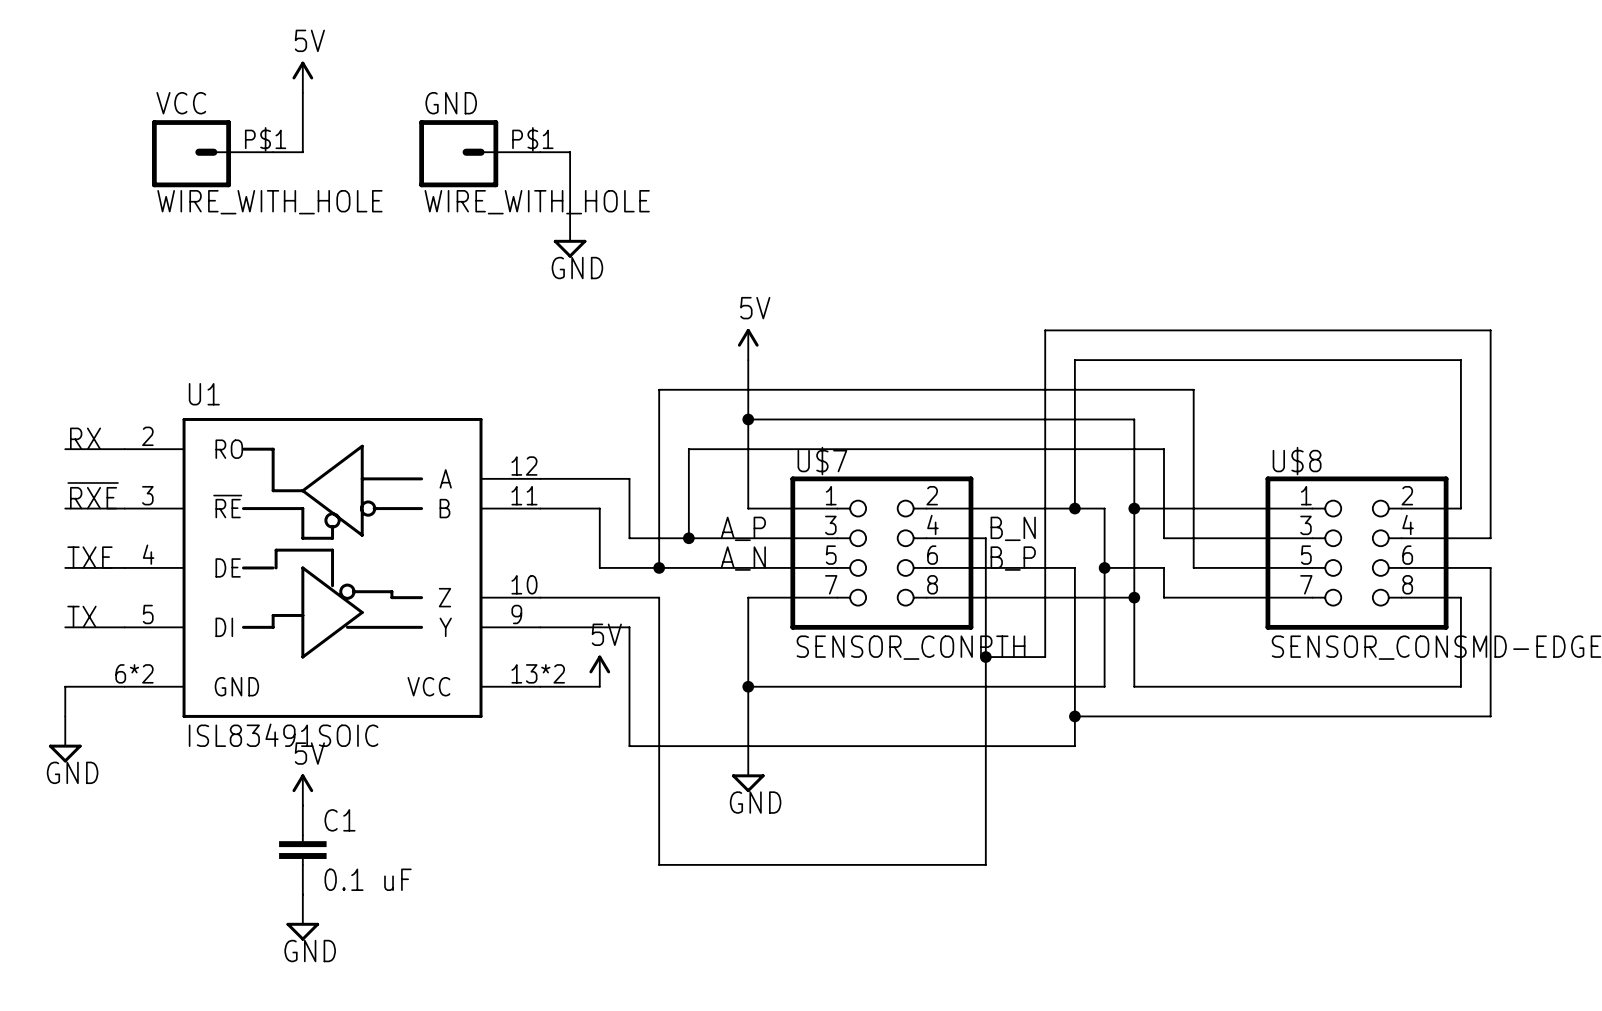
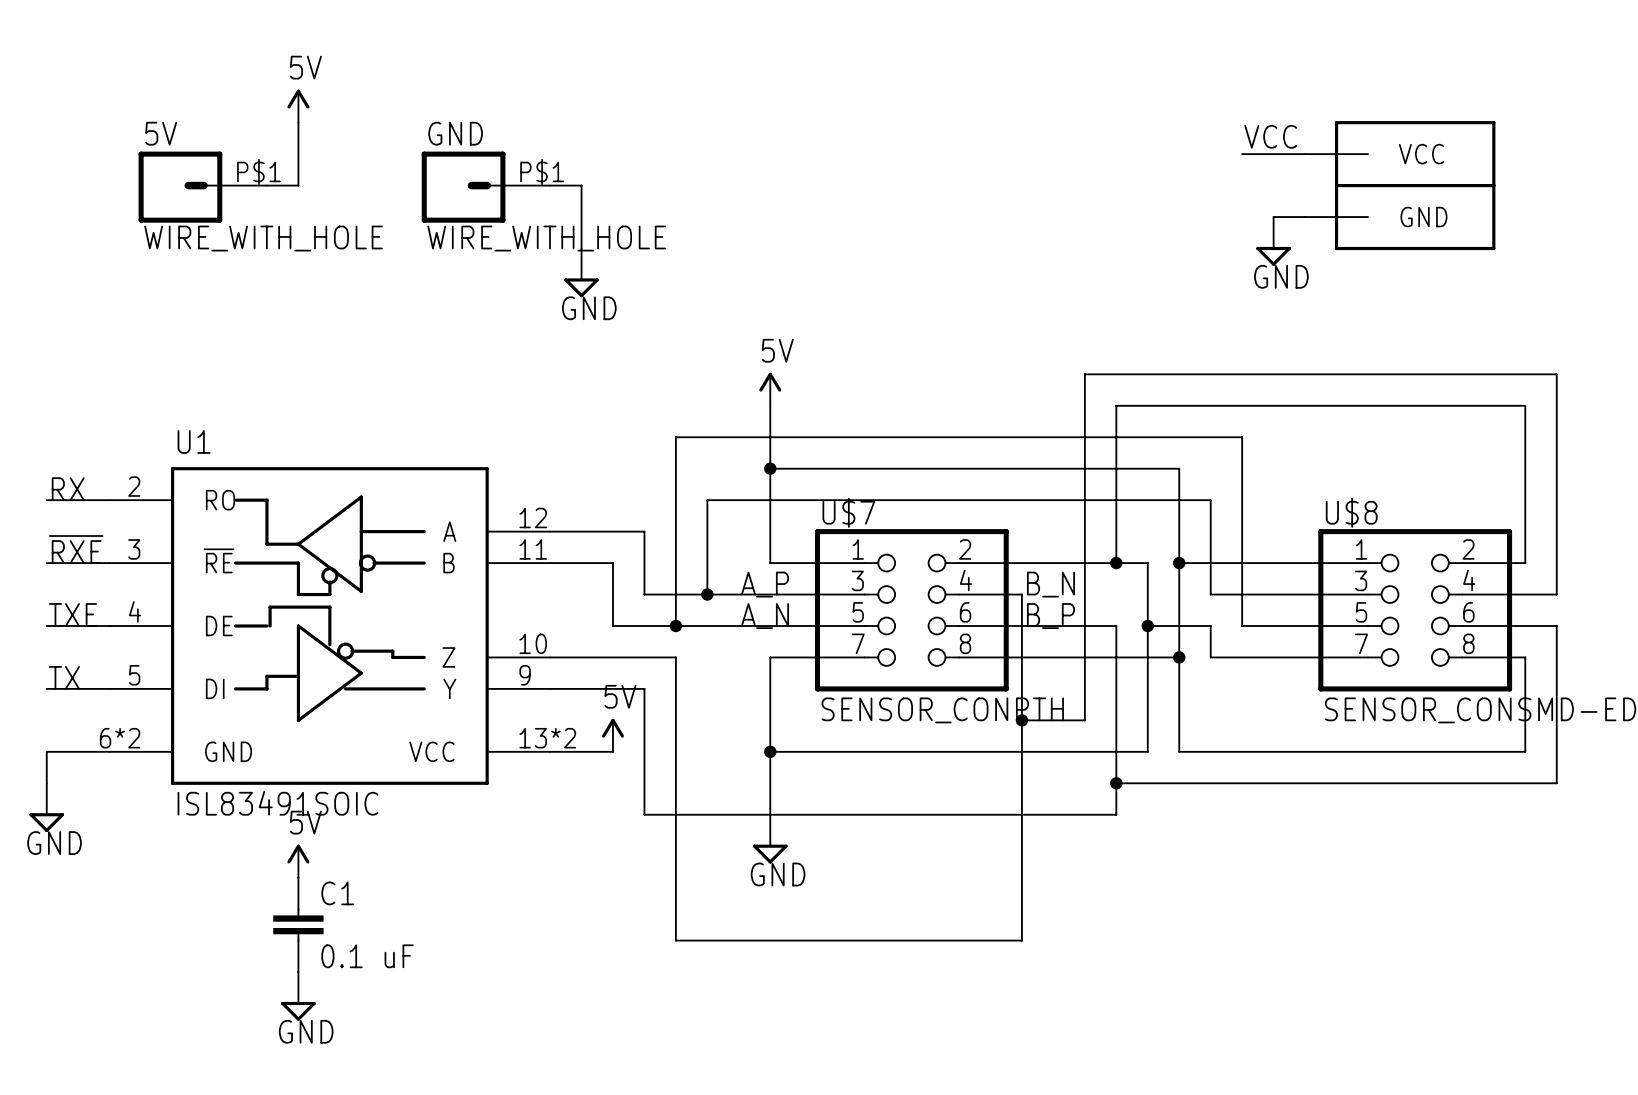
VCC name: VCC (181, 103) -> 5V (161, 133)
label: none -> VCC (1270, 136)
wire: none -> (1242, 154) (1305, 154)
part: none -> (1400, 185)
wire: none -> (1273, 217) (1305, 217)
power symbol: none -> GND (1273, 241)

